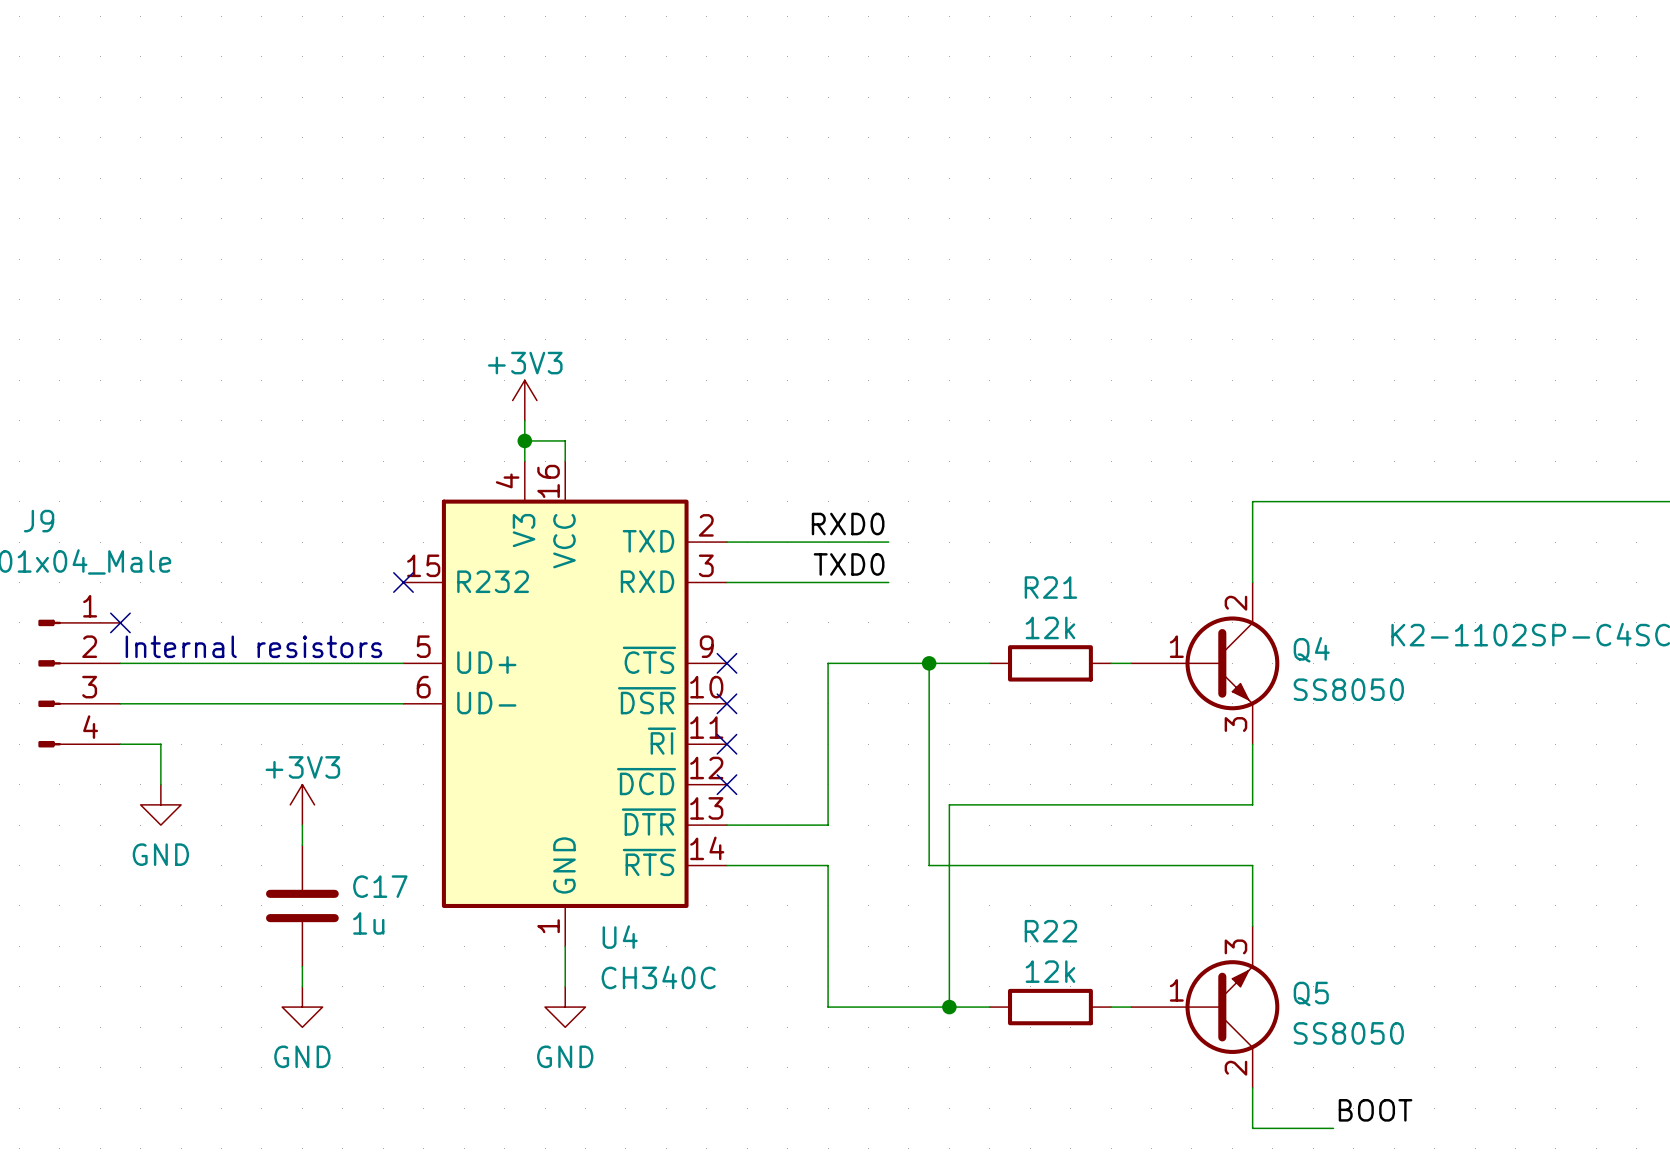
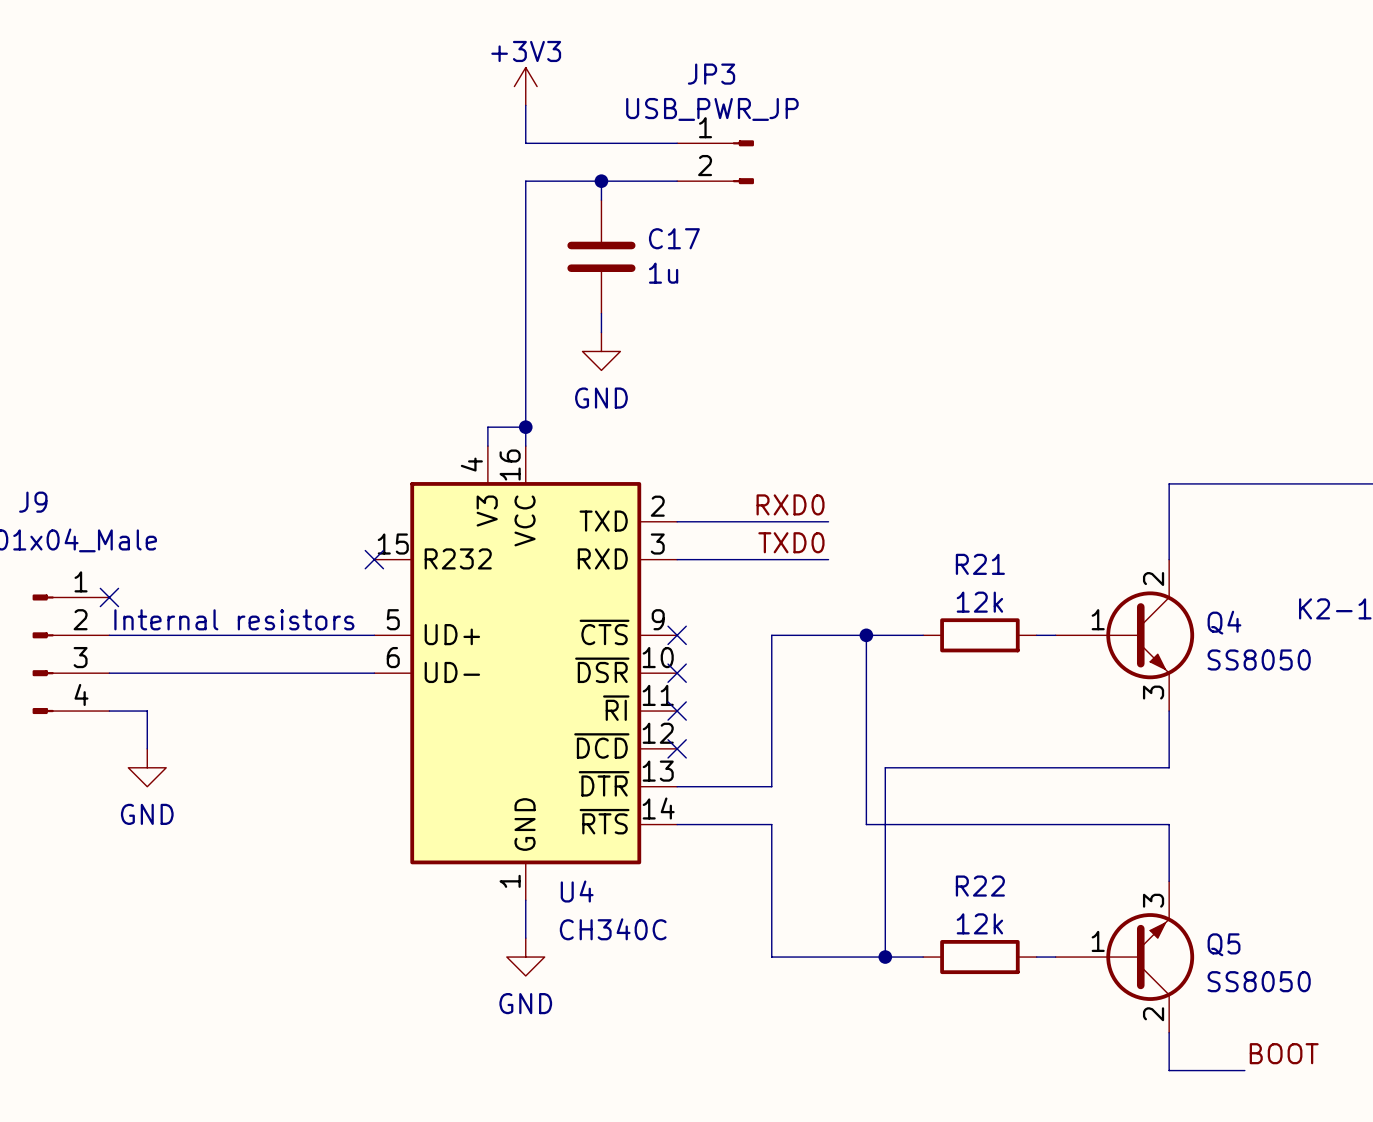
wire: none -> (525, 105) (525, 143) (677, 143)
JP3: none -> USB_PWR_JP (715, 162)
wire: none -> (601, 181) (601, 200)
junction: none -> (601, 181)
wire: none -> (677, 181) (525, 181) (525, 427)
power symbol: none -> GND (601, 351)
power symbol position: +3V3 (524, 400) -> +3V3 (525, 86)
wire: (524, 420) (524, 440) -> (601, 313) (601, 332)
junction position: (524, 440) -> (525, 427)
power symbol: +3V3 (302, 804) -> none
wire: (302, 825) (302, 845) -> none
C17 position: (302, 905) -> (601, 256)
wire: (302, 966) (302, 986) -> none
power symbol: GND (302, 1007) -> none

